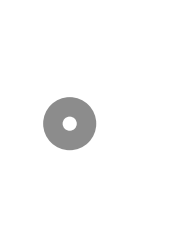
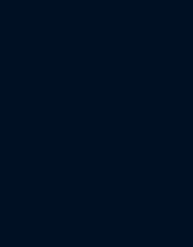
via: (69, 123) -> none

